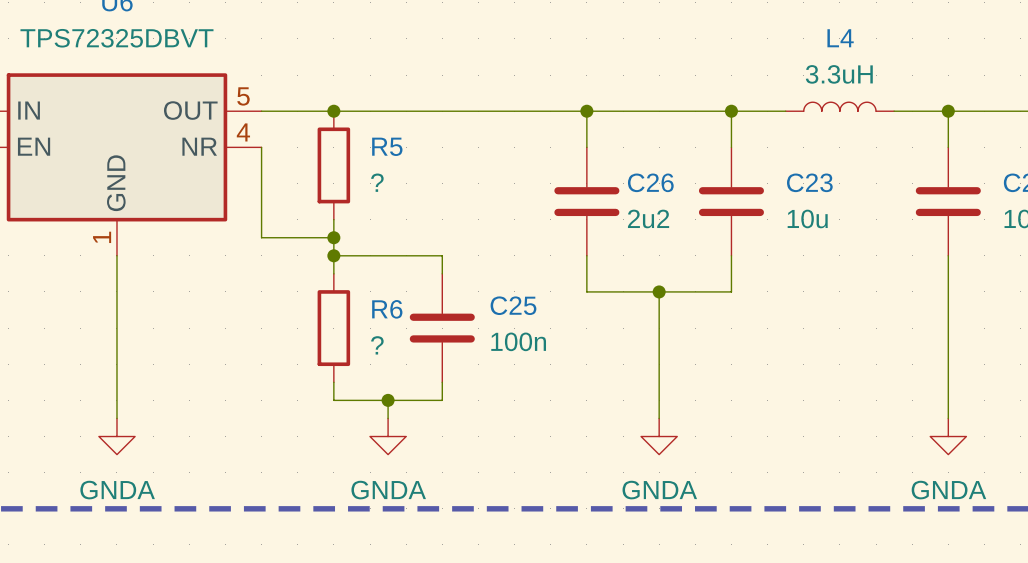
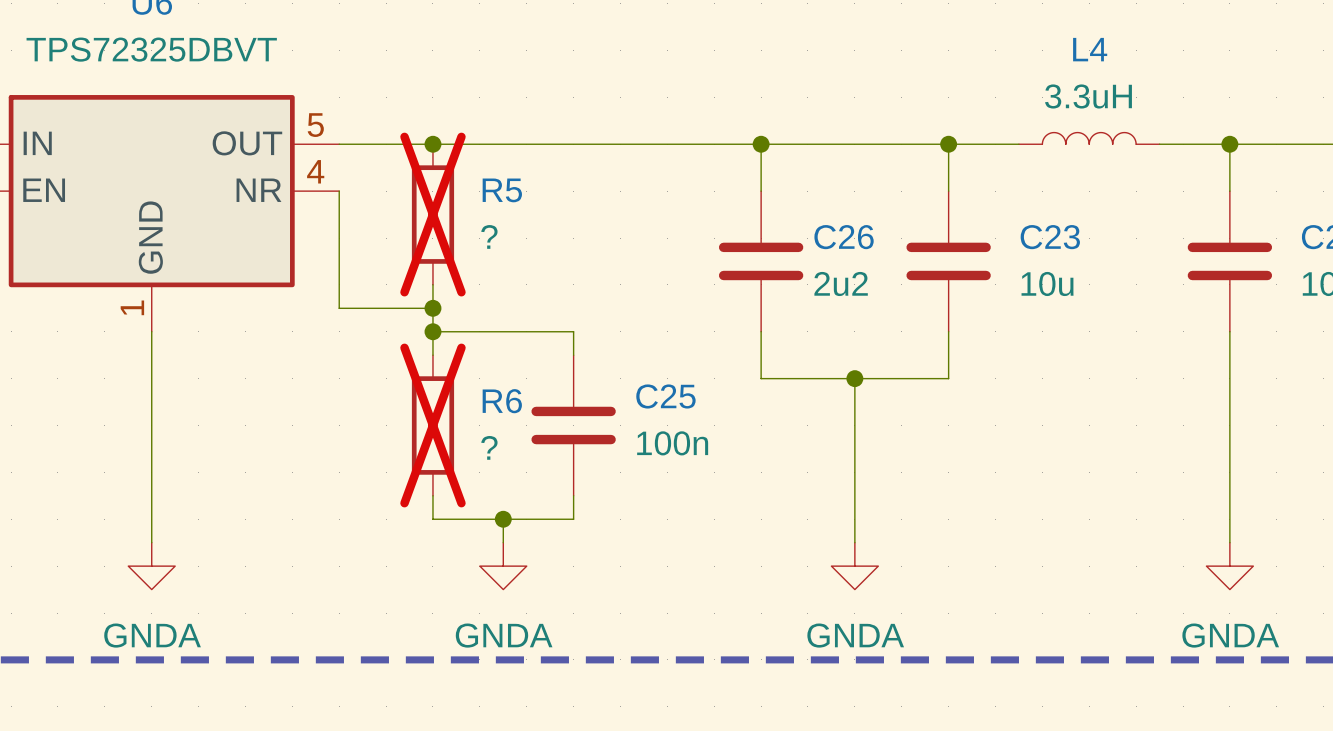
R5 do-not-place cross: none -> (432, 214)
R6 do-not-place cross: none -> (432, 425)

